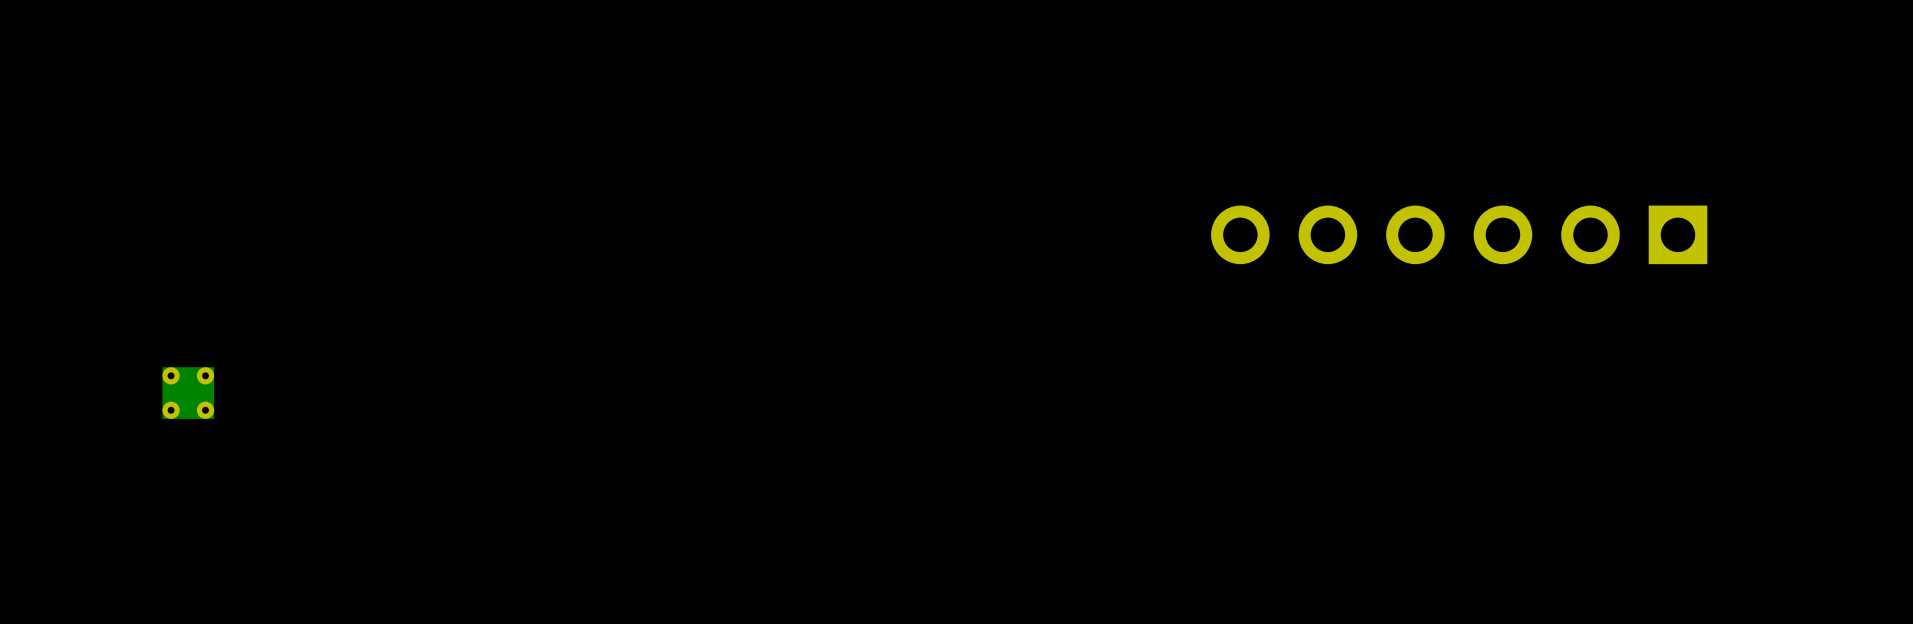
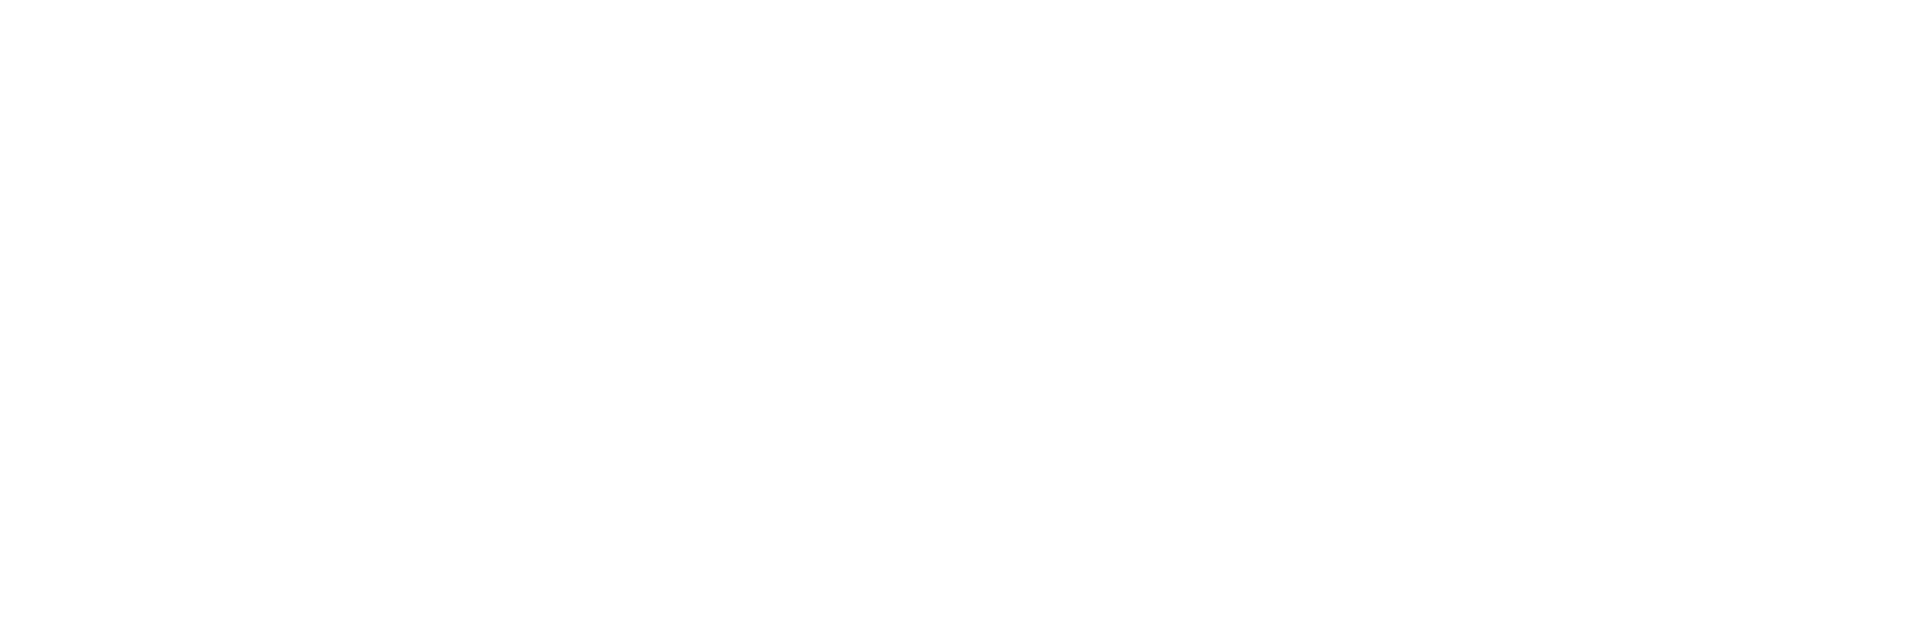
part: (1459, 234) -> none
part: (188, 393) -> none

